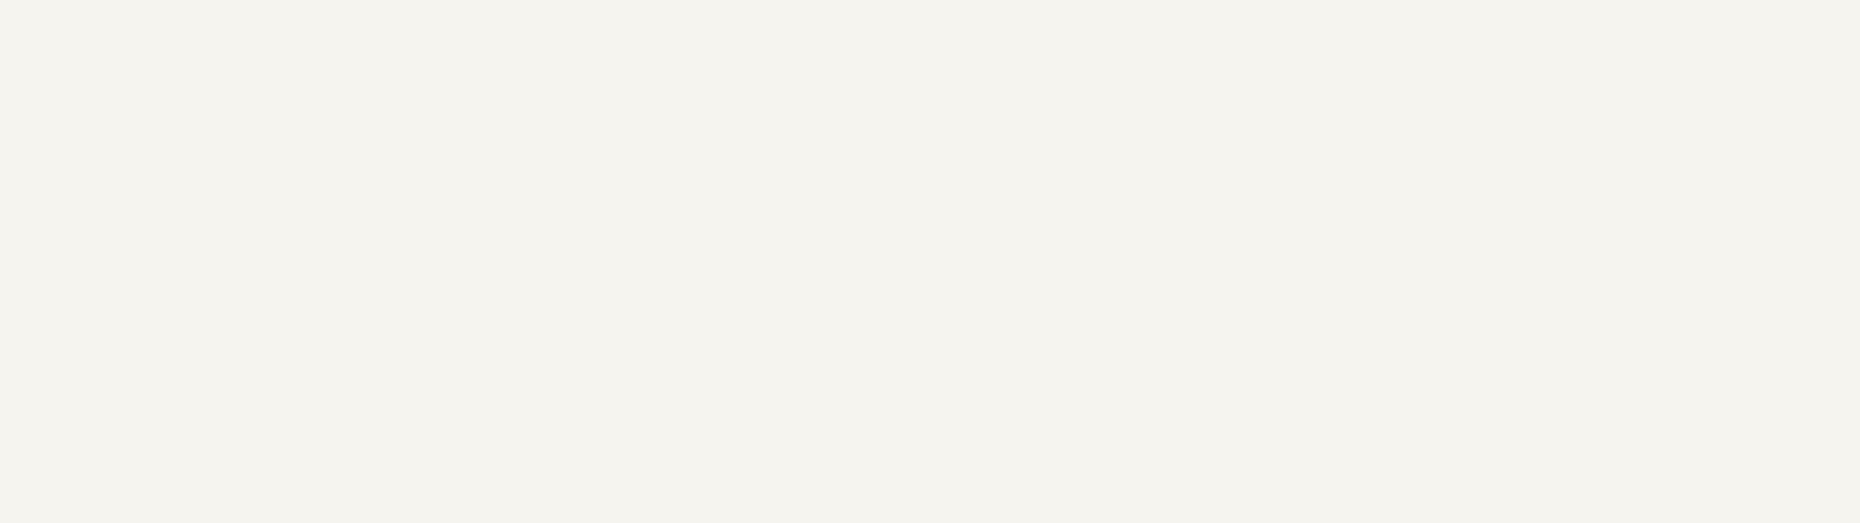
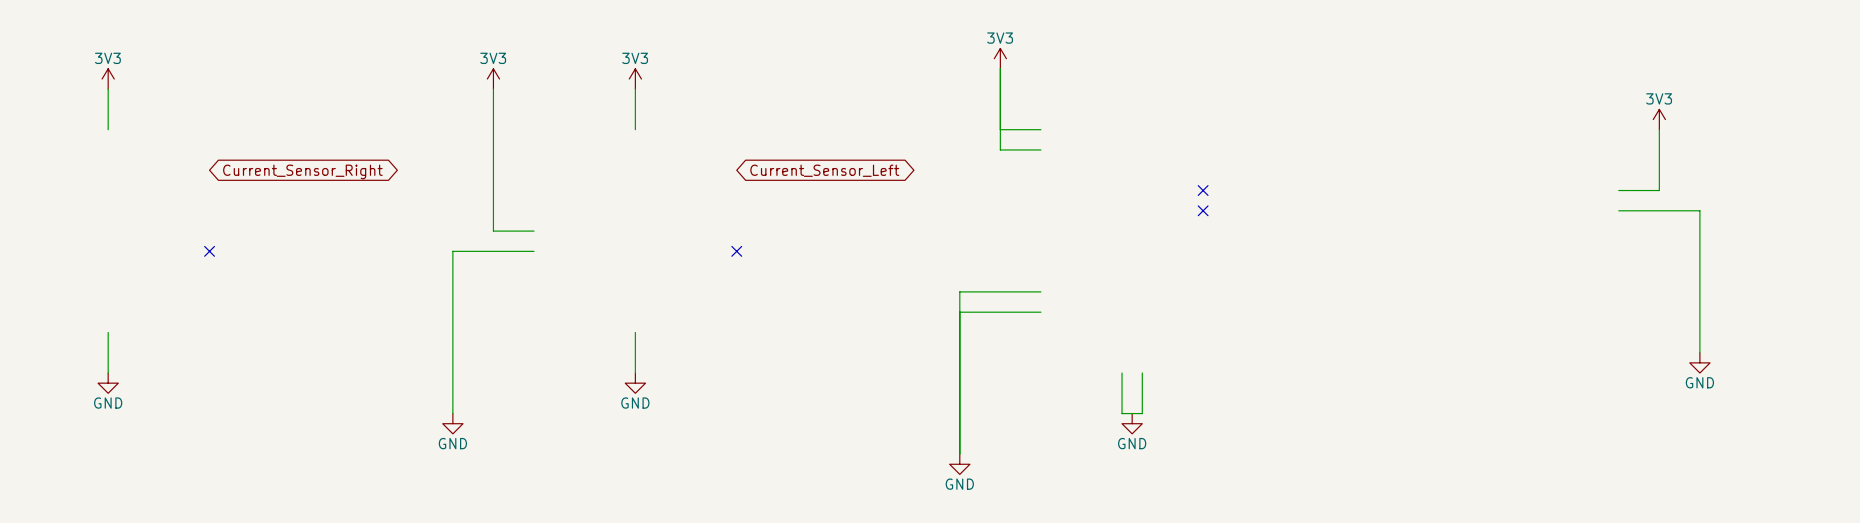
power symbol: none -> 3V3 (1000, 58)
wire: none -> (1000, 68) (1000, 149) (1040, 149)
power symbol: none -> 3V3 (108, 79)
power symbol: none -> 3V3 (493, 79)
power symbol: none -> 3V3 (635, 79)
wire: none -> (108, 89) (108, 129)
wire: none -> (493, 89) (493, 231) (533, 231)
wire: none -> (635, 89) (635, 129)
power symbol: none -> 3V3 (1659, 119)
wire: none -> (1000, 129) (1040, 129)
wire: none -> (1659, 129) (1659, 190) (1618, 190)
global label: none -> Current_Sensor_Right (302, 171)
global label: none -> Current_Sensor_Left (824, 170)
no-connect mark: none -> (1203, 190)
no-connect mark: none -> (1203, 210)
wire: none -> (1618, 210) (1699, 210) (1699, 352)
no-connect mark: none -> (209, 251)
wire: none -> (533, 251) (452, 251) (452, 413)
no-connect mark: none -> (736, 251)
wire: none -> (1040, 291) (959, 291) (959, 454)
wire: none -> (959, 312) (1040, 312)
wire: none -> (108, 332) (108, 373)
wire: none -> (635, 332) (635, 373)
power symbol: none -> GND (1699, 362)
wire: none -> (1122, 373) (1122, 413) (1142, 413) (1142, 373)
power symbol: none -> GND (108, 383)
power symbol: none -> GND (635, 383)
power symbol: none -> GND (452, 423)
power symbol: none -> GND (1132, 423)
power symbol: none -> GND (959, 464)

